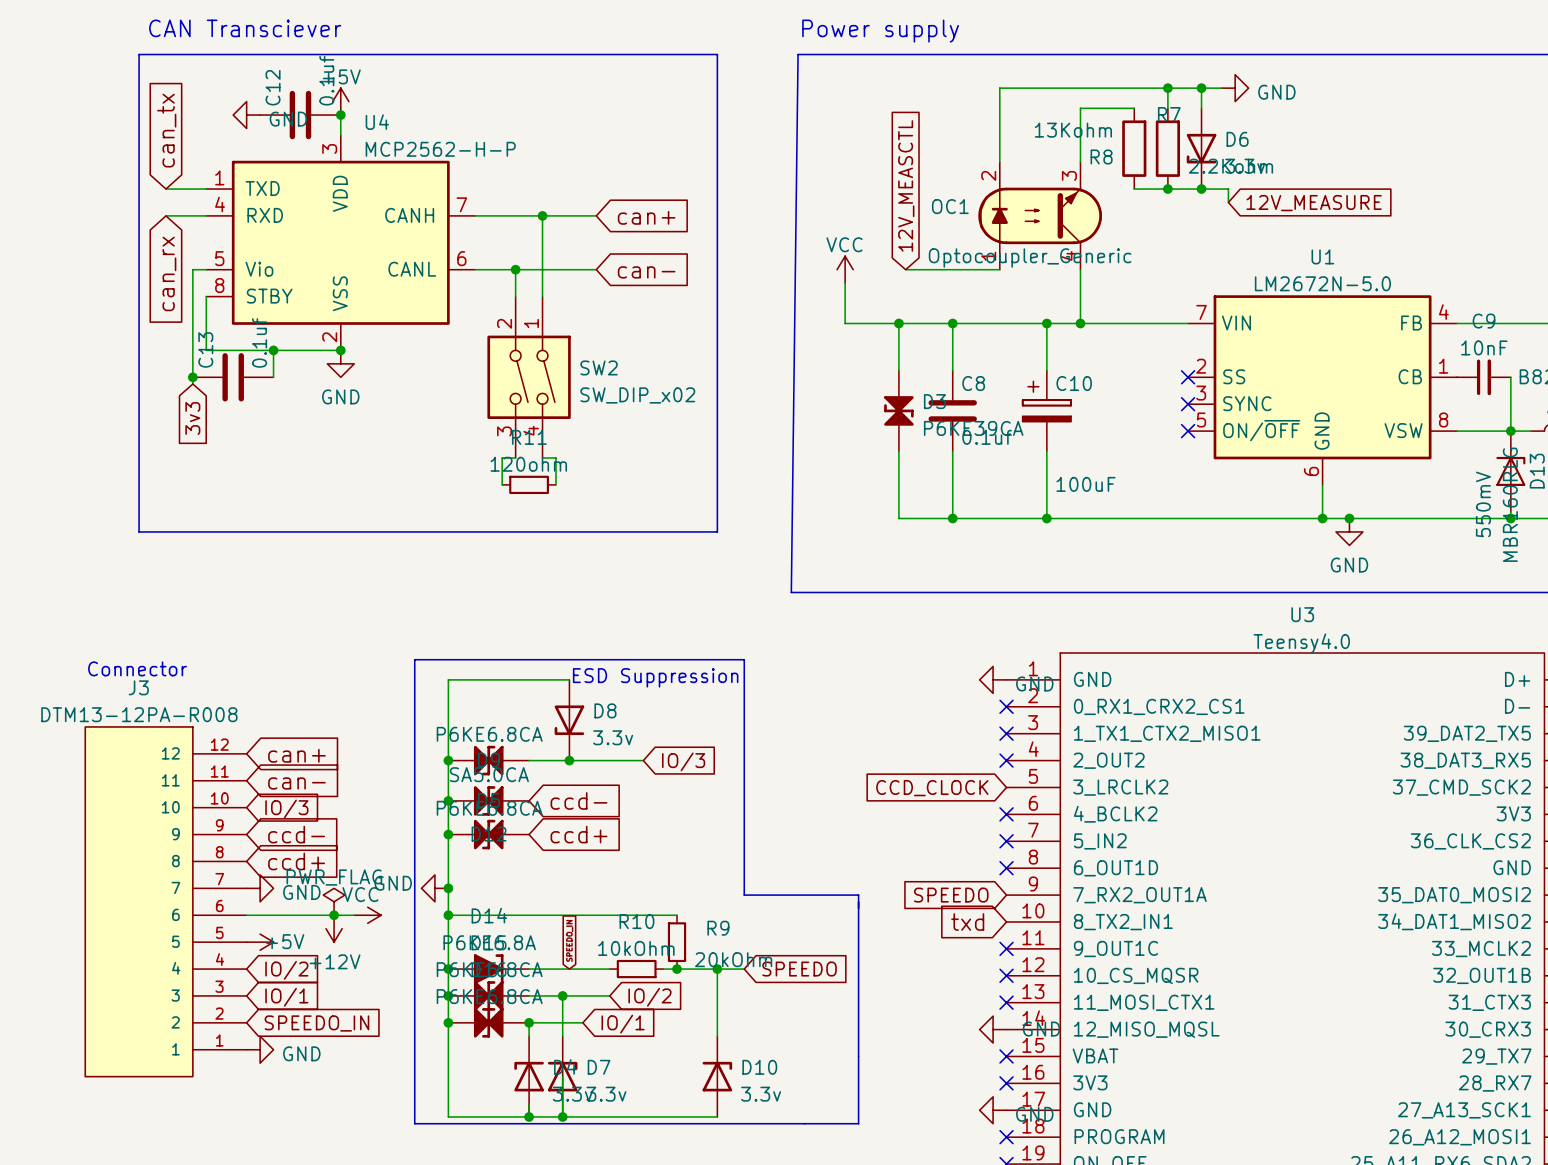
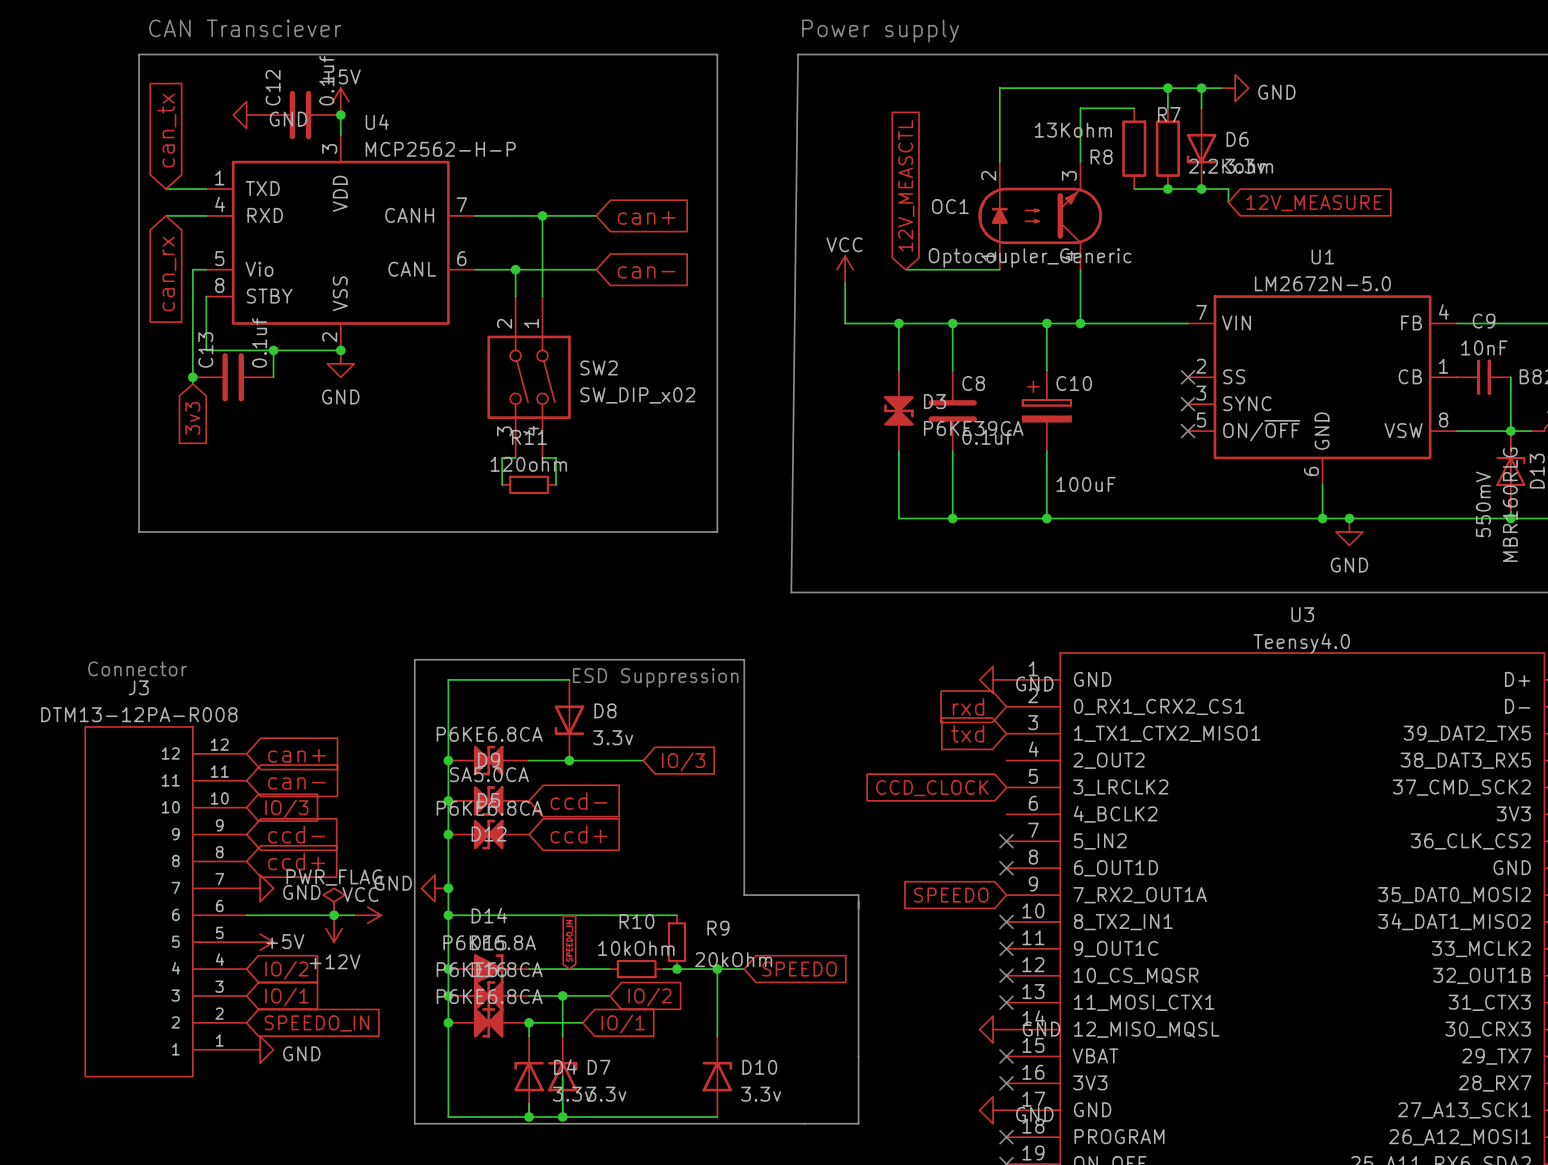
global label: none -> rxd (968, 706)
no-connect mark: (1006, 706) -> none
no-connect mark: (1006, 733) -> none
no-connect mark: (1006, 760) -> none
no-connect mark: (1006, 814) -> none
global label position: txd (967, 921) -> txd (967, 733)
no-connect mark: none -> (1006, 921)

